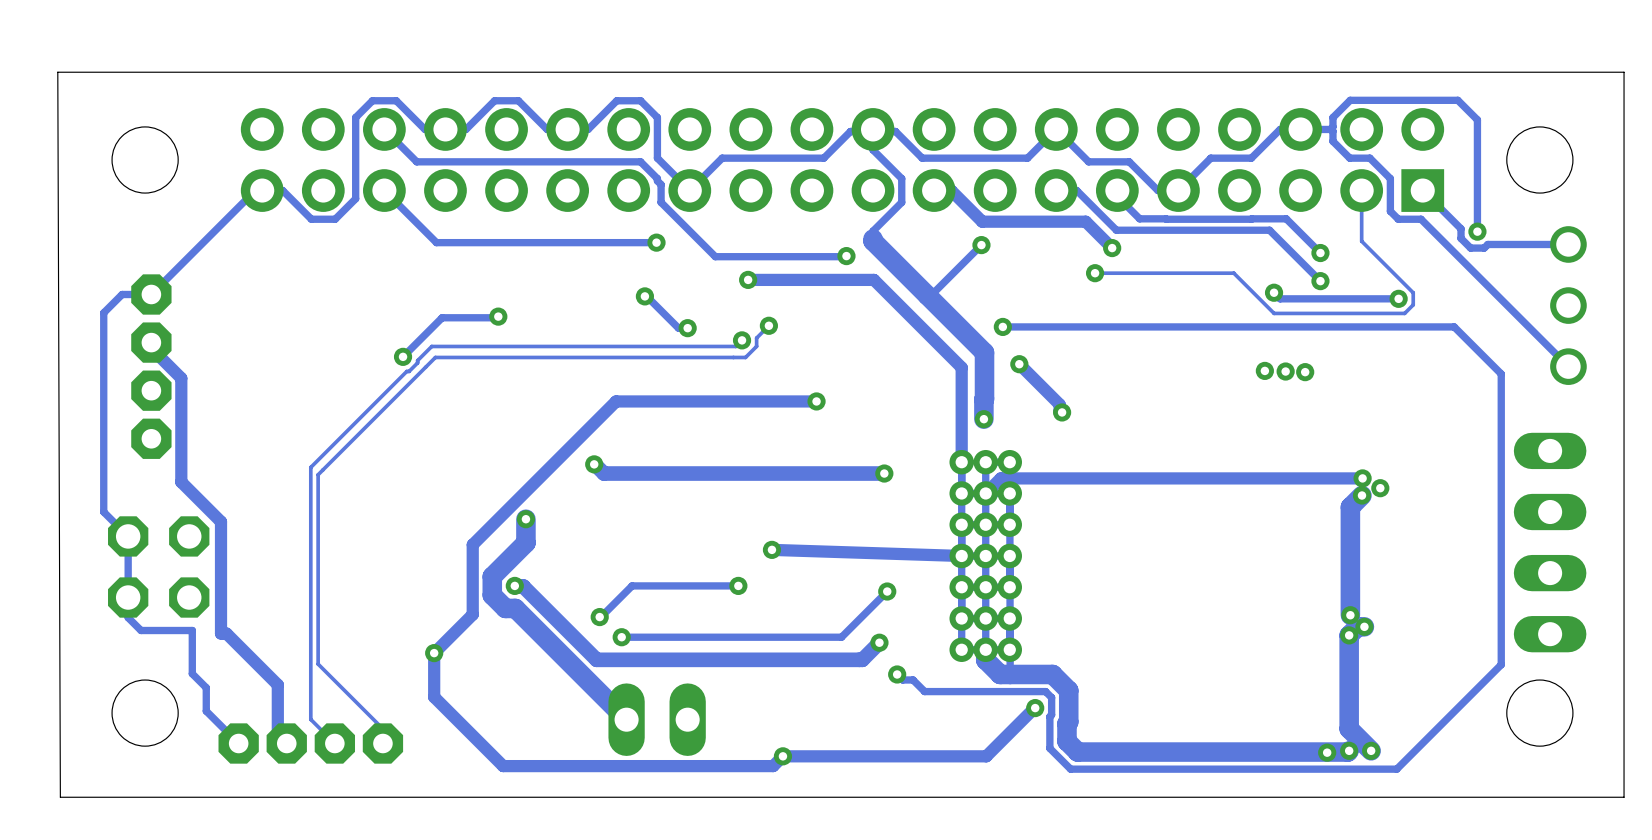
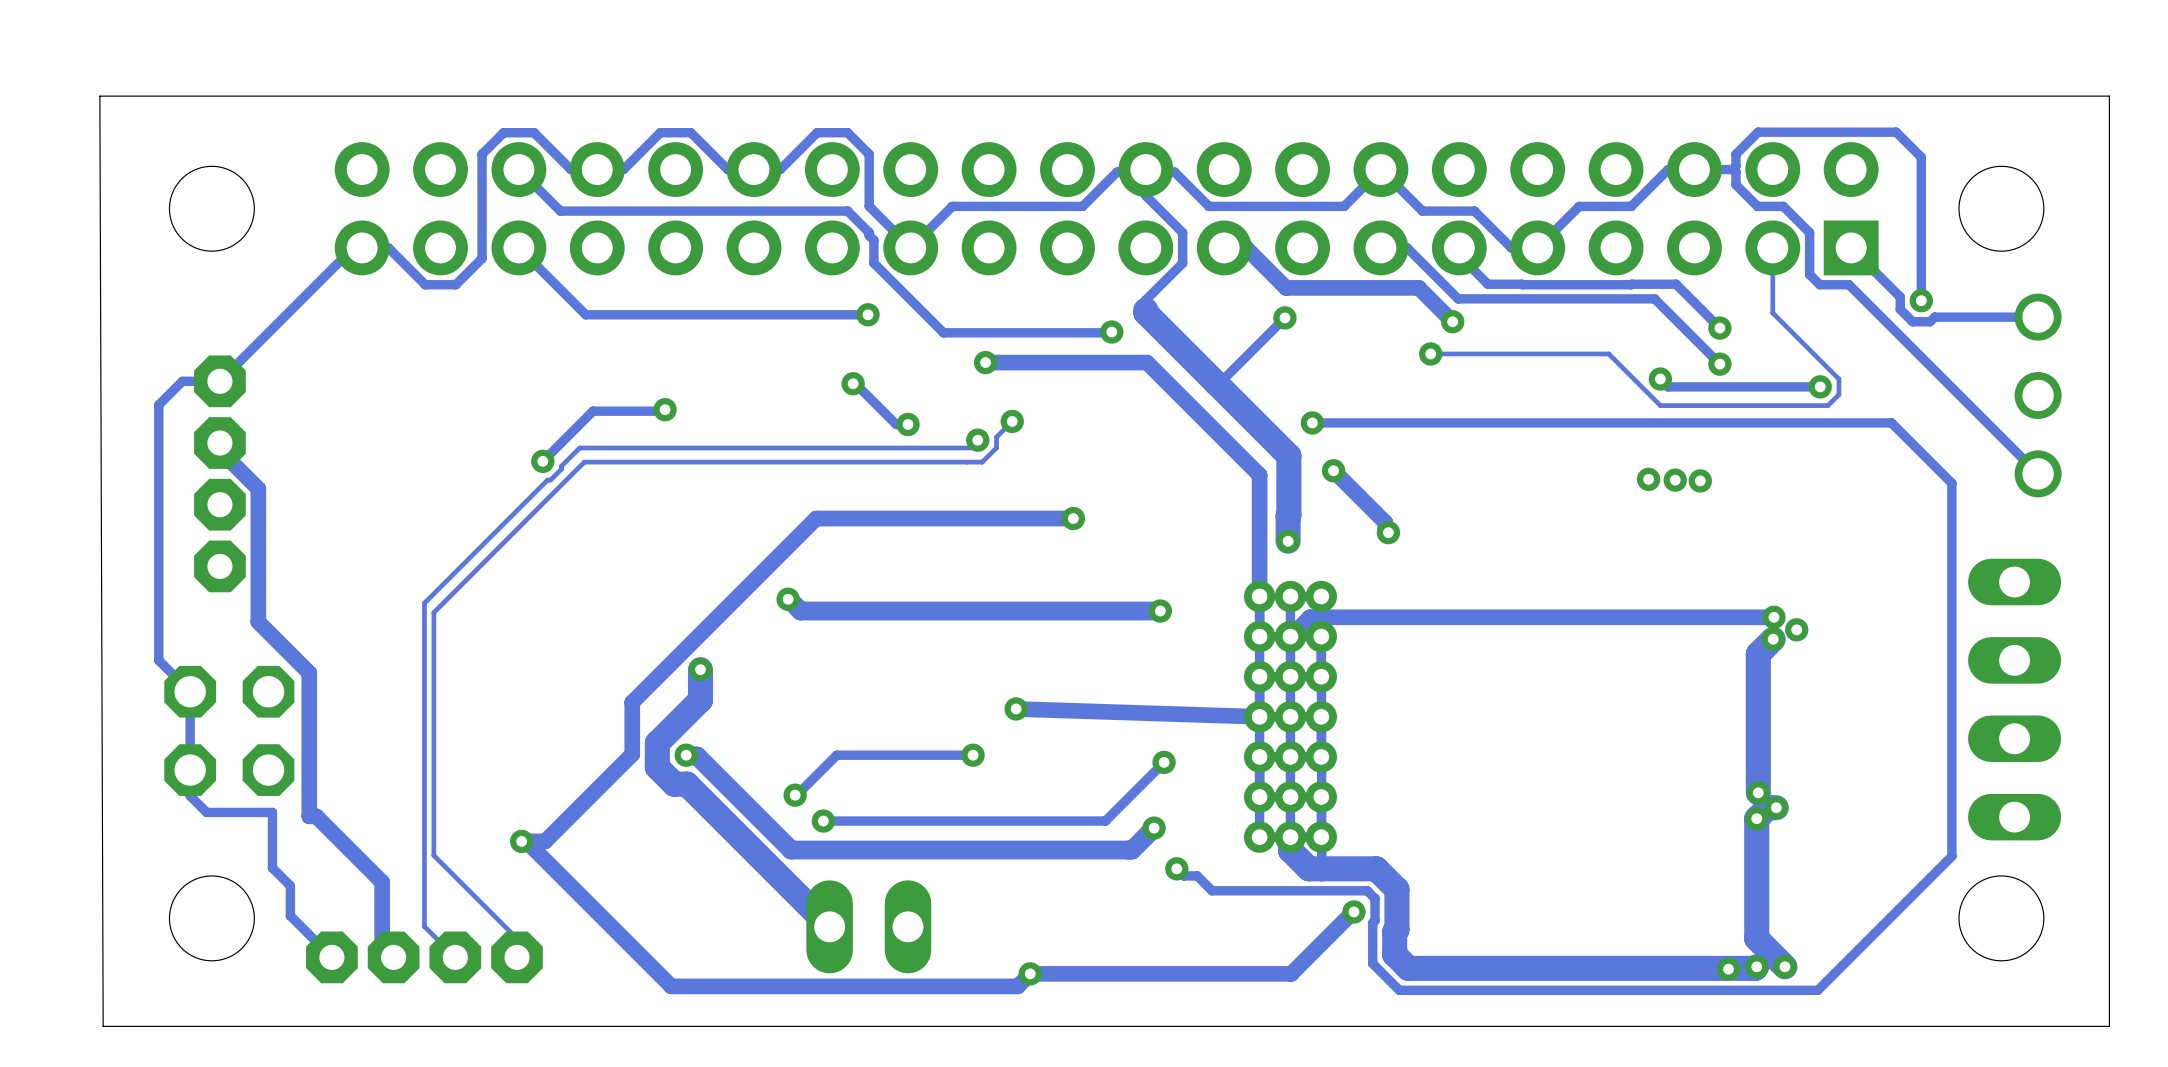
track: (472, 585) (472, 614) (434, 653) (434, 697) -> (632, 754) (545, 841) (521, 841)
track: none -> (526, 841) (582, 897)
via position: (434, 653) -> (521, 841)

